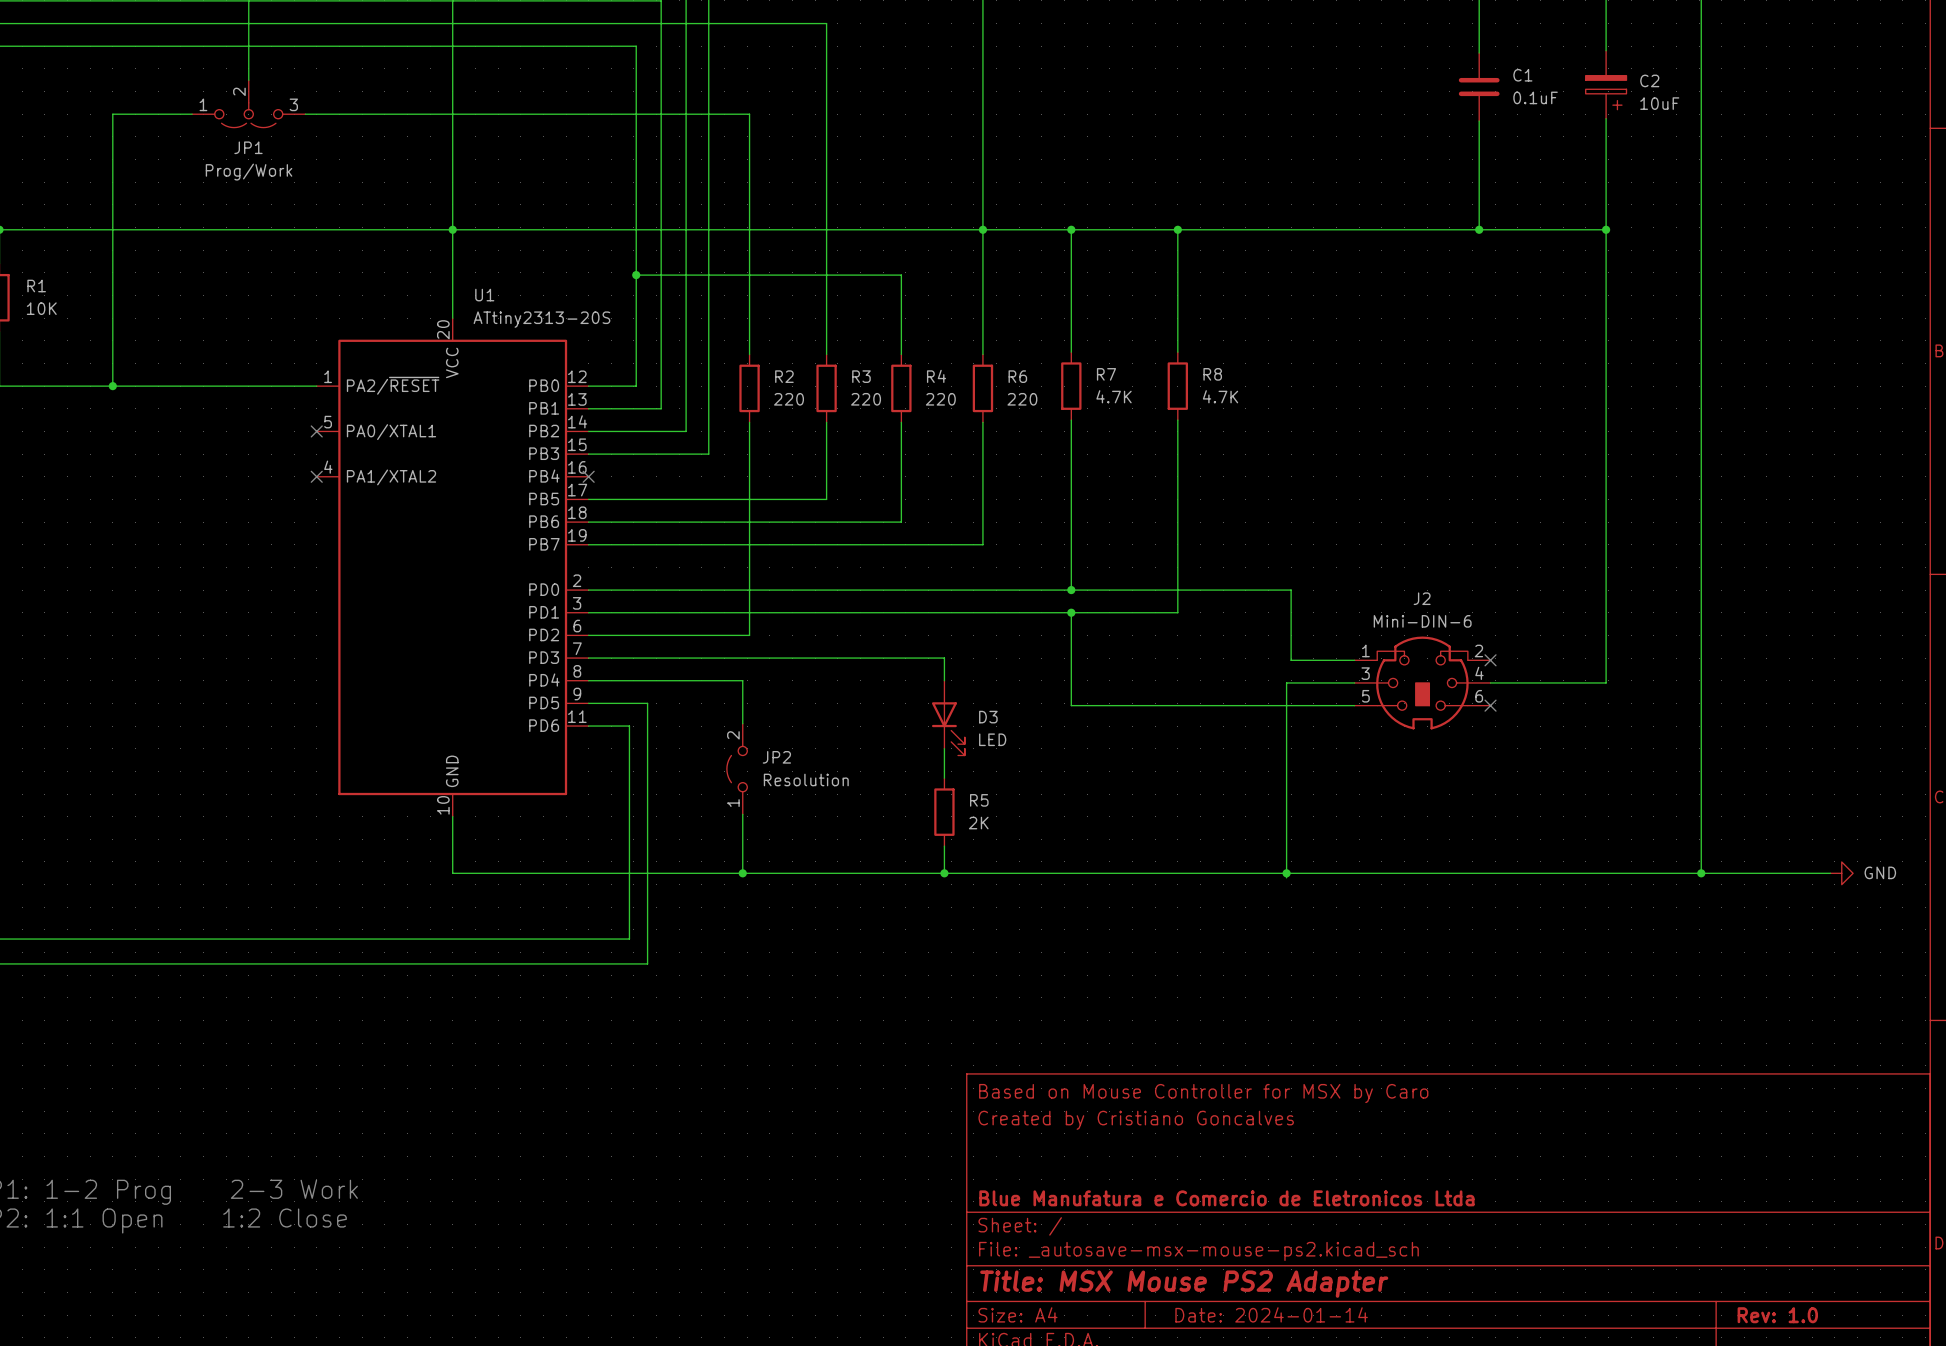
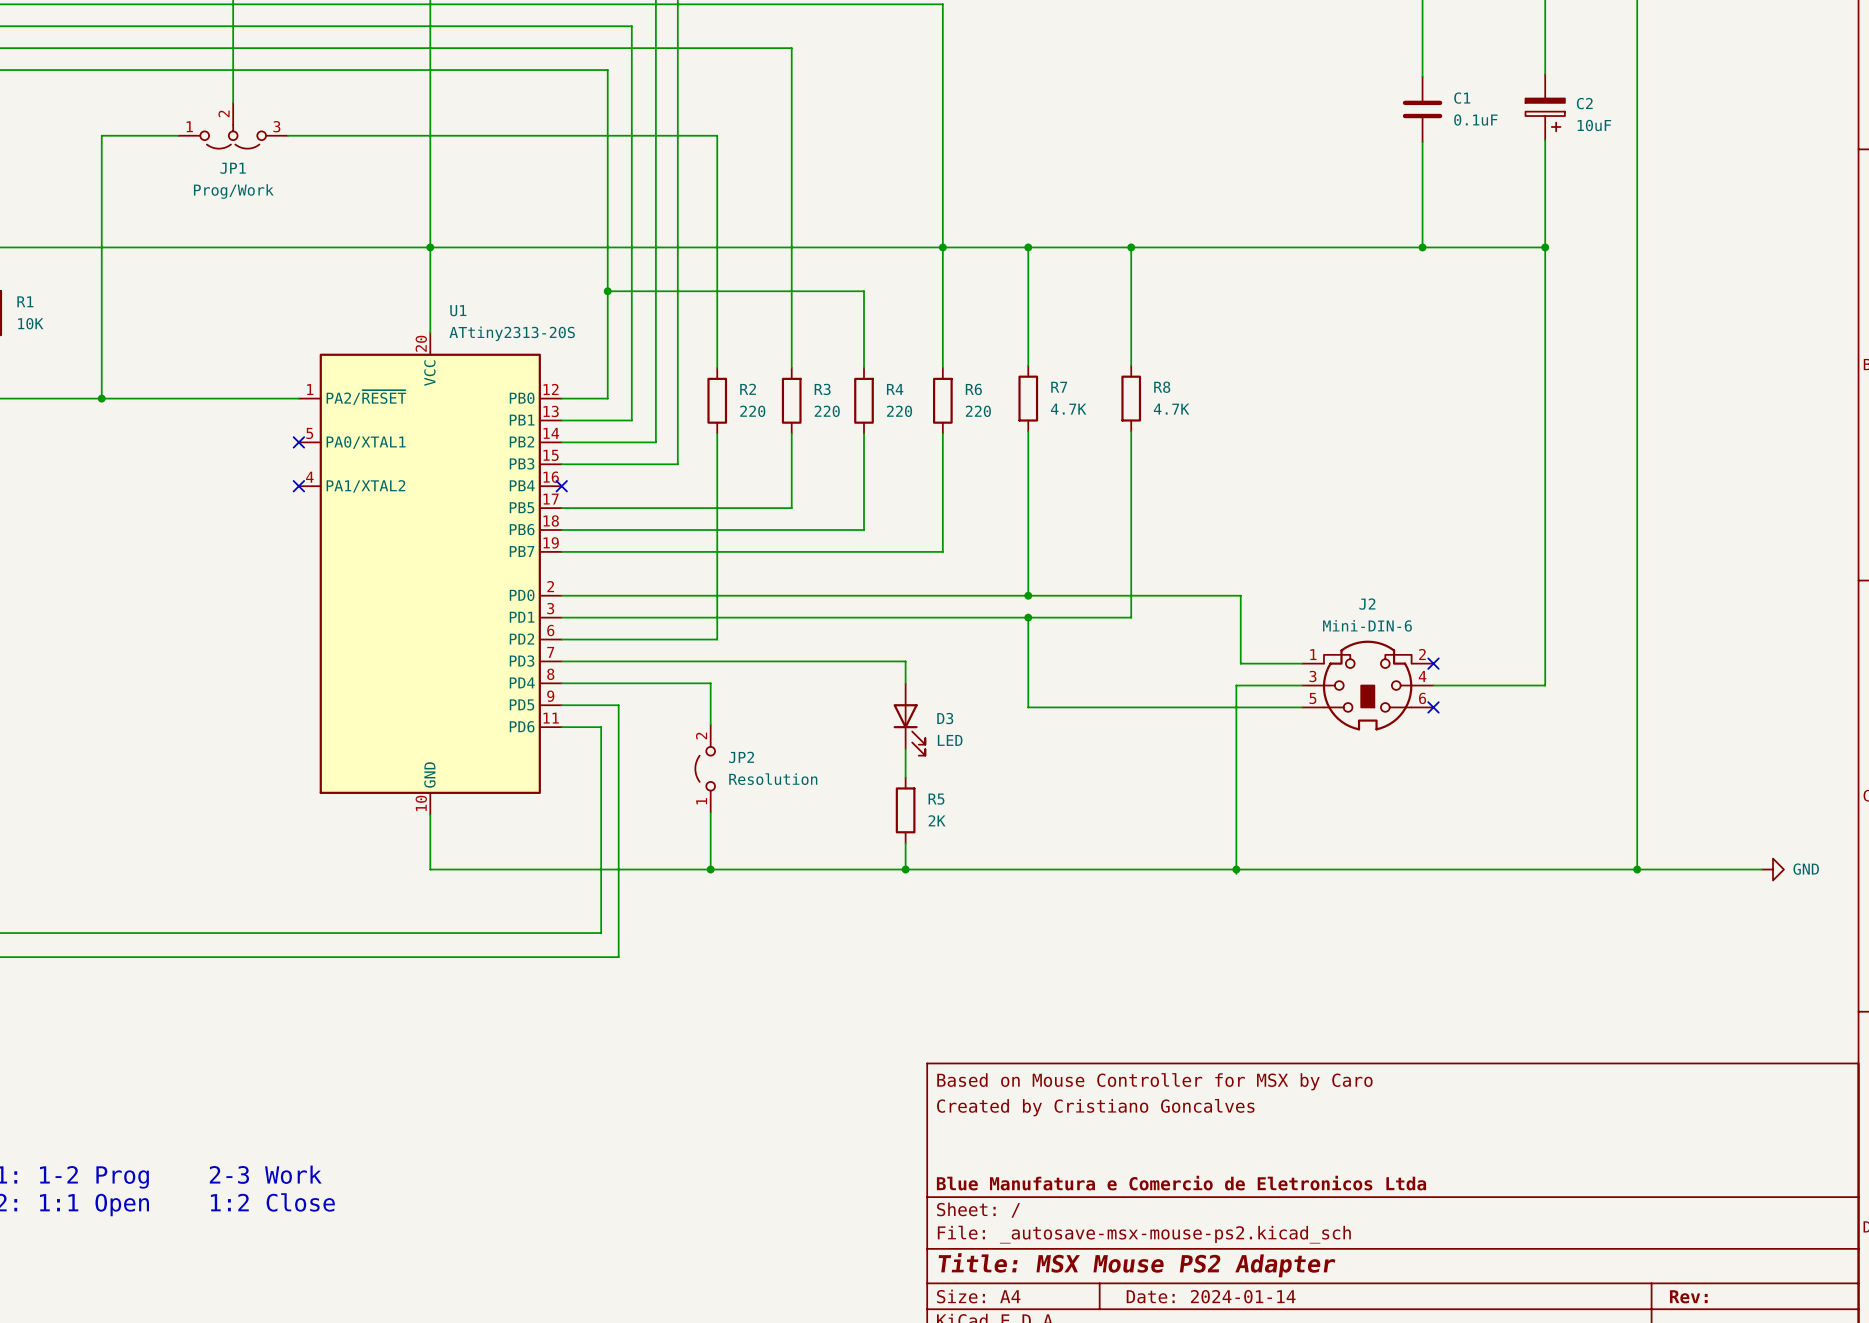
title block: Rev: 1.0 (1777, 1315) -> Rev: (1688, 1296)

